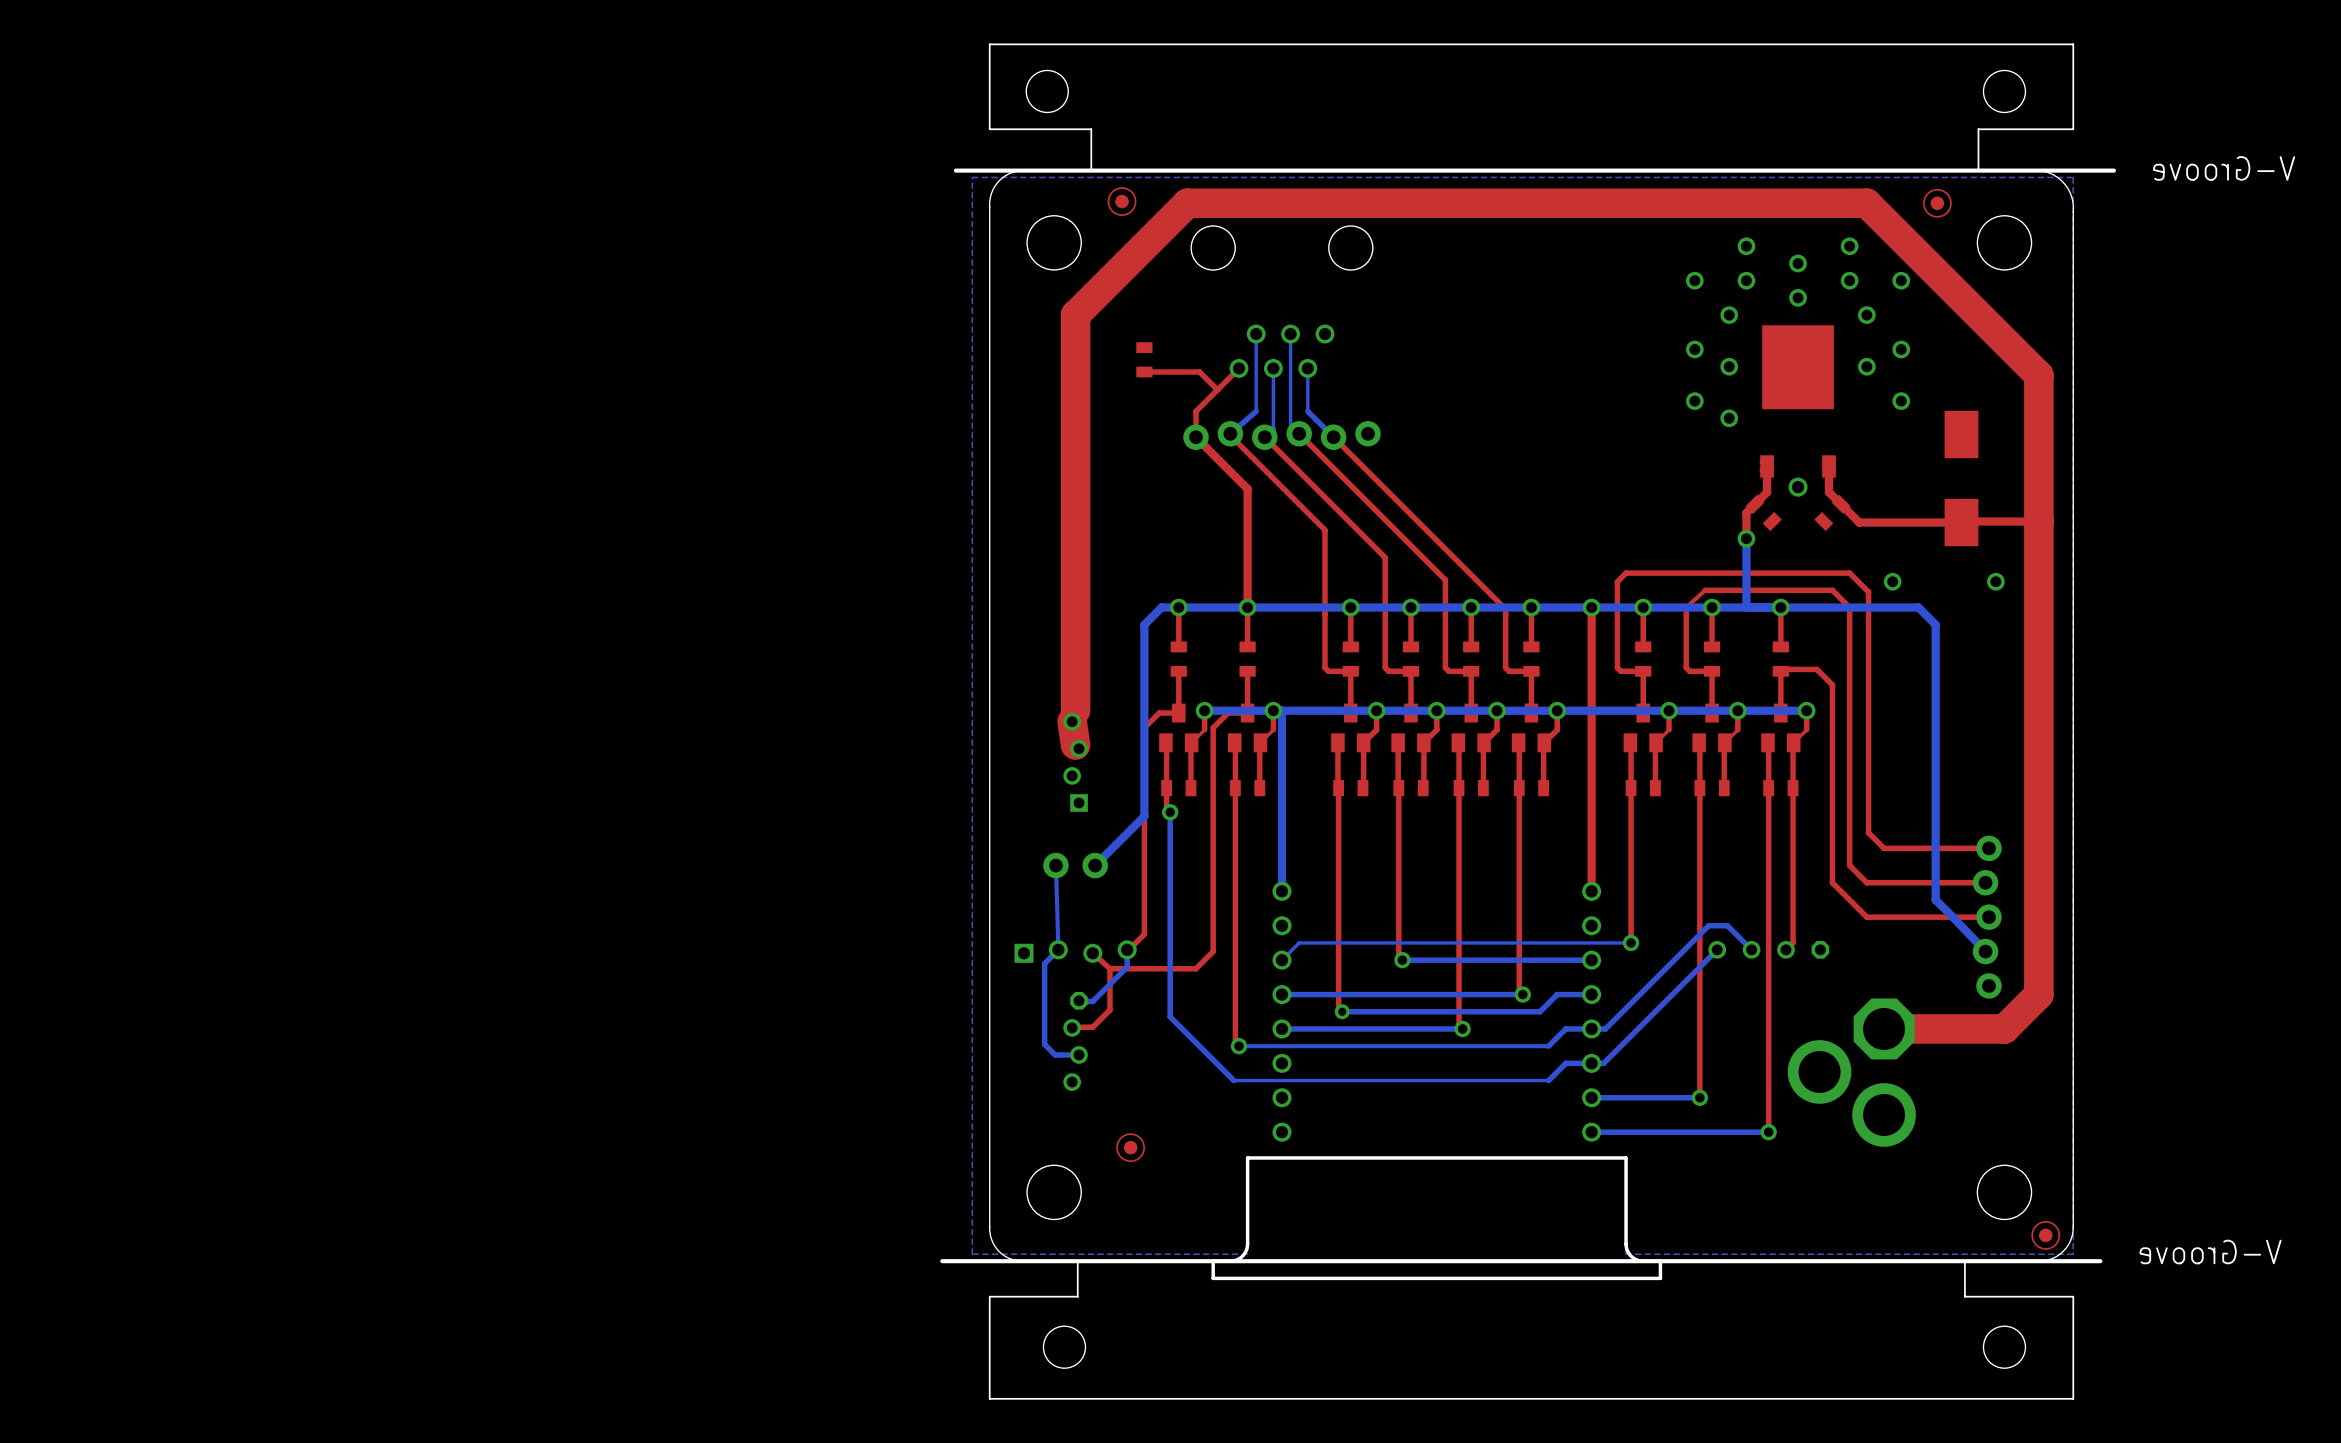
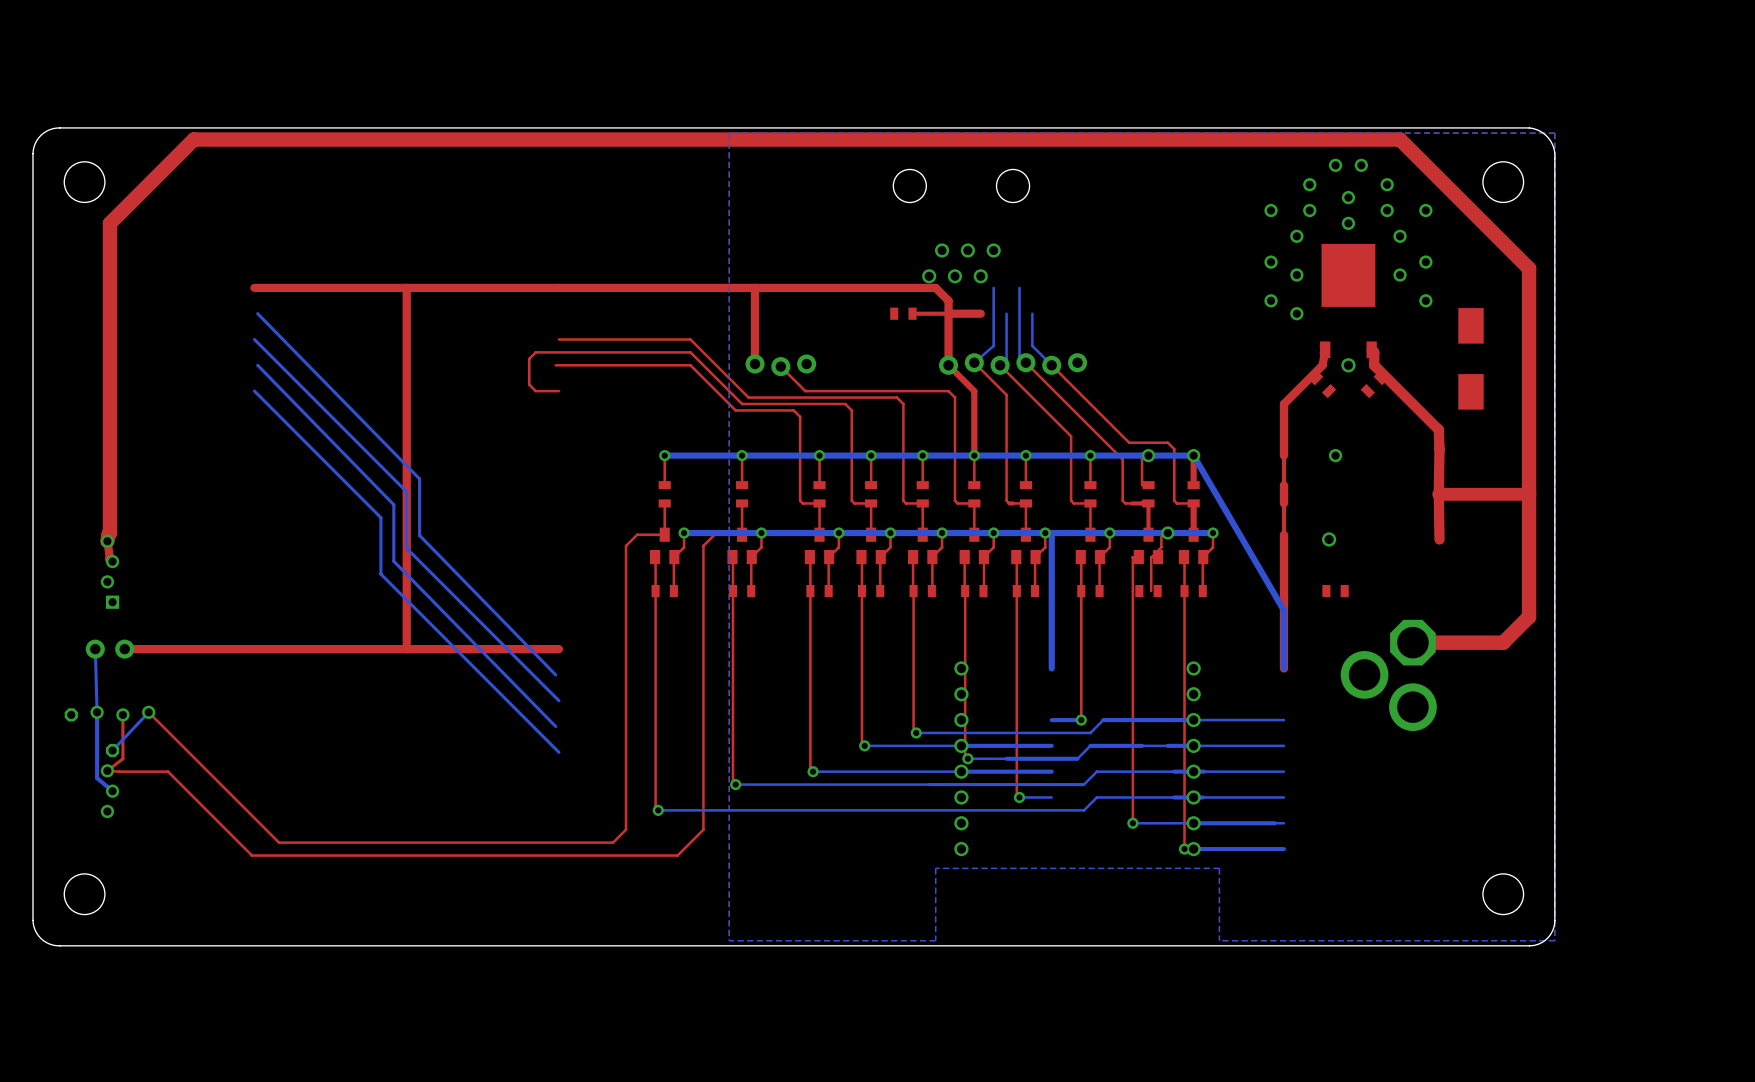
part: (1122, 201) -> none
part: (1937, 203) -> none
via: none -> (1335, 165)
via: none -> (1361, 165)
bottom track: (1256, 334) (1256, 411) (1230, 433) -> (993, 287) (993, 345) (974, 362)
bottom track: (1290, 334) (1290, 428) (1299, 433) -> (1019, 287) (1019, 358) (1025, 362)
part rotation: 0° (1144, 359) -> 90° clockwise (903, 313)
part position: (1144, 359) -> (903, 313)
top track: (1239, 368) (1195, 411) (1195, 437) (1247, 488) (1247, 646) -> none
bottom track: (1273, 368) (1273, 428) (1264, 437) -> (1006, 313) (1006, 358) (1000, 365)
bottom track: (1307, 368) (1307, 411) (1333, 437) -> (1032, 313) (1032, 345) (1051, 365)
top track: (1144, 372) (1199, 372) (1217, 389) -> none
top track: (2038, 375) (1866, 203) (1187, 203) (1075, 315) (1075, 710) (1072, 721) (1075, 745) (1079, 748) -> (1529, 281) (1529, 268) (1400, 139) (193, 139) (110, 223) (110, 533) (107, 541) (110, 558) (112, 561)
top track width: thick (2038, 375) (2038, 822) -> thin (1529, 281) (1529, 616)
top track: none -> (254, 287) (935, 287) (948, 300) (948, 365) (974, 391) (974, 485)
top track: none -> (406, 287) (406, 649)
top track: none -> (755, 287) (755, 364)
bottom track: none -> (257, 313) (419, 478) (419, 535) (555, 674)
top track: none -> (980, 313) (912, 313)
top track: (1230, 433) (1325, 530) (1325, 667) (1328, 671) (1345, 671) -> (974, 362) (1006, 394) (1006, 500) (1009, 503)
top track: (1299, 433) (1445, 580) (1445, 667) (1449, 671) -> (1000, 365) (1071, 436) (1071, 500) (1073, 503) (1086, 503)
part position: (1282, 435) -> (1013, 364)
top track: (1264, 437) (1385, 557) (1385, 667) (1388, 671) (1411, 671) (1411, 713) -> none
top track: (1333, 437) (1505, 609) (1505, 667) (1509, 671) -> (1025, 362) (1122, 459) (1122, 500) (1125, 503) (1131, 503)
bottom track: none -> (254, 339) (406, 491) (406, 548) (558, 700)
top track: none -> (558, 339) (690, 339) (748, 397) (896, 397) (903, 404) (903, 500) (906, 503) (922, 503) (922, 534)
top track: (1767, 466) (1767, 492) (1746, 512) (1746, 538) -> (1325, 349) (1322, 365) (1283, 404) (1283, 455)
top track: (1829, 466) (1829, 492) (1859, 522) (2038, 521) -> (1371, 349) (1374, 352) (1374, 365) (1438, 429) (1438, 494)
bottom track: none -> (257, 365) (393, 504) (393, 561) (555, 726)
top track: none -> (555, 365) (690, 365) (735, 410) (793, 410) (800, 416) (800, 500) (802, 503) (819, 503) (819, 534)
part: none -> (780, 365)
top track: none -> (780, 366) (805, 391) (948, 391) (954, 397) (954, 500) (957, 503) (974, 503) (974, 534)
bottom track: none -> (254, 391) (380, 517) (380, 574) (558, 752)
top track: none -> (558, 391) (535, 391) (529, 384) (529, 358) (535, 352) (690, 352) (742, 404) (845, 404) (851, 410) (851, 500) (854, 503) (871, 503) (871, 534)
bottom track: (1746, 538) (1746, 607) -> none
via: (1746, 538) -> none
via: (1892, 581) -> none
via: (1995, 581) -> none
top track: none -> (664, 455) (664, 485)
via: none -> (664, 455)
via: none -> (742, 455)
top track: none -> (819, 455) (819, 485)
via: none -> (819, 455)
bottom track: (1161, 607) (1144, 624) (1144, 816) (1095, 865) -> (871, 455) (664, 455)
via: none -> (871, 455)
top track: (1178, 607) (1178, 646) -> (742, 455) (742, 485)
via: (1178, 607) -> none
via: none -> (922, 455)
via: (1247, 607) -> none
via: none -> (974, 455)
top track: (1350, 607) (1350, 646) -> (871, 455) (871, 485)
via: (1350, 607) -> none
via: none -> (1025, 455)
top track: (1411, 607) (1411, 646) -> (922, 455) (922, 485)
via: (1411, 607) -> none
via: none -> (1090, 455)
top track: (1471, 607) (1471, 646) -> (1025, 455) (1025, 485)
via: (1471, 607) -> none
top track: (1531, 607) (1531, 646) -> none
bottom track: (1591, 607) (1918, 607) (1935, 624) (1935, 899) (1985, 951) -> (1193, 455) (1283, 610) (1283, 668)
top track: (1643, 607) (1643, 646) -> (1090, 455) (1090, 485)
via: (1643, 607) -> none
via: (1712, 607) -> none
top track: (1780, 607) (1780, 646) -> (1142, 455) (1142, 485)
top track: (1591, 646) (1591, 671) -> (1051, 365) (1129, 442) (1167, 442) (1174, 449) (1174, 500) (1176, 503) (1193, 503)
part: none -> (664, 494)
part: none -> (742, 494)
part: none -> (819, 494)
part position: (1178, 659) -> (871, 494)
part position: (1247, 659) -> (922, 494)
part: none -> (974, 494)
part position: (1350, 659) -> (1025, 494)
part: (1411, 659) -> none
part position: (1471, 659) -> (1090, 494)
part position: (1643, 659) -> (1193, 494)
part: (1712, 659) -> none
part: (1780, 659) -> none
top track: none -> (1438, 494) (1439, 539)
top track: none -> (1529, 494) (1438, 494)
top track: none -> (664, 503) (664, 534) (637, 534) (626, 545) (626, 829) (613, 842) (279, 842) (148, 712)
top track: none -> (742, 503) (742, 534) (714, 534) (703, 545) (703, 829) (677, 855) (251, 855) (168, 771) (107, 770) (122, 758) (122, 714)
top track: (1178, 671) (1178, 713) (1159, 713) (1144, 727) (1144, 934) (1127, 949) -> none
top track: (1247, 671) (1247, 713) (1228, 713) (1213, 727) (1213, 951) (1195, 968) (1109, 968) -> none
top track: (1350, 671) (1350, 713) -> (1013, 503) (1025, 503) (1025, 534)
top track: (1454, 671) (1471, 671) (1471, 713) -> (1090, 503) (1090, 534)
top track: (1712, 671) (1689, 671) (1686, 667) (1686, 607) (1705, 590) (1832, 590) (1849, 607) (1849, 865) (1866, 882) (1985, 882) -> (1283, 503) (1283, 485)
top track: none -> (684, 533) (684, 547) (673, 557) (673, 591)
via: none -> (684, 533)
via: none -> (761, 533)
top track: none -> (838, 533) (838, 547) (828, 557) (828, 591)
via: none -> (838, 533)
top track: none -> (890, 533) (890, 547) (880, 557) (880, 591)
via: none -> (890, 533)
top track: (1204, 710) (1204, 729) (1190, 743) (1190, 788) -> (761, 533) (761, 547) (751, 557) (751, 591)
bottom track: none -> (903, 533) (684, 533)
via: (1204, 710) -> none
via: none -> (942, 533)
top track: (1273, 710) (1273, 729) (1259, 743) (1259, 788) -> (1045, 533) (1045, 547) (1035, 557) (1035, 591)
via: (1273, 710) -> none
bottom track: (1282, 710) (1282, 891) -> (1051, 533) (1051, 668)
via: none -> (993, 533)
top track: (1376, 710) (1376, 729) (1363, 742) (1363, 788) -> (942, 533) (942, 547) (932, 557) (931, 591)
via: (1376, 710) -> none
via: none -> (1045, 533)
top track: (1436, 710) (1436, 729) (1423, 742) (1423, 788) -> (993, 533) (993, 547) (983, 557) (983, 591)
via: (1436, 710) -> none
via: none -> (1109, 533)
top track: (1497, 710) (1497, 729) (1483, 743) (1483, 788) -> (1212, 533) (1212, 547) (1202, 557) (1202, 591)
via: (1497, 710) -> none
top track: (1557, 710) (1557, 729) (1543, 743) (1543, 788) -> none
via: none -> (1212, 533)
top track: (1669, 710) (1669, 729) (1655, 743) (1655, 788) -> (1109, 533) (1109, 547) (1099, 557) (1099, 591)
via: (1669, 710) -> none
top track: (1737, 710) (1737, 729) (1724, 743) (1724, 788) -> (1161, 533) (1161, 547) (1151, 557) (1151, 591)
via: (1737, 710) -> none
top track: (1806, 710) (1806, 729) (1793, 743) (1793, 942) (1786, 949) -> none
bottom track: (1806, 710) (1617, 710) -> none
via: (1806, 710) -> none
top track: (1591, 713) (1591, 891) -> (1283, 534) (1283, 668)
top track: (1643, 713) (1643, 671) (1621, 671) (1617, 667) (1617, 581) (1626, 573) (1849, 573) (1868, 592) (1868, 832) (1884, 848) (1988, 848) -> none
top track: (1780, 713) (1780, 671) (1782, 669) (1816, 669) (1832, 684) (1832, 882) (1866, 917) (1988, 917) -> none
part: none -> (793, 536)
via: none -> (1329, 539)
part: (1528, 721) -> none
part: none -> (664, 545)
part: none -> (742, 545)
part: none -> (819, 545)
part position: (1178, 727) -> (871, 545)
part position: (1247, 727) -> (922, 545)
part: none -> (974, 545)
part position: (1350, 727) -> (1025, 545)
part: (1411, 727) -> none
part position: (1471, 727) -> (1090, 545)
part position: (1643, 727) -> (1193, 545)
part: (1712, 727) -> none
part: (1780, 727) -> none
top track: none -> (655, 557) (655, 806) (658, 810)
top track: none -> (809, 557) (810, 768) (813, 771)
top track: none -> (861, 557) (861, 743) (864, 745)
top track: (1165, 742) (1166, 807) (1170, 812) -> none
top track: none -> (913, 557) (913, 730) (916, 732)
top track: (1234, 742) (1235, 1042) (1239, 1046) -> (732, 557) (732, 781) (735, 784)
top track: (1337, 742) (1338, 1008) (1342, 1011) -> (964, 557) (965, 756) (967, 758)
top track: none -> (1016, 557) (1016, 794) (1019, 797)
top track: (1398, 742) (1398, 956) (1402, 960) -> none
top track: none -> (1080, 557) (1081, 720)
top track: (1458, 742) (1459, 1025) (1462, 1028) -> none
top track: (1518, 742) (1519, 990) (1522, 994) -> none
top track: (1630, 742) (1631, 942) -> none
top track: (1699, 742) (1699, 1097) -> (1132, 557) (1132, 823)
top track: (1767, 742) (1768, 1132) -> (1183, 557) (1184, 849)
part: none -> (110, 571)
part: (1075, 762) -> none
part: none -> (664, 591)
part: none -> (742, 591)
part: none -> (819, 591)
part position: (1178, 788) -> (871, 591)
part position: (1247, 788) -> (922, 591)
part: none -> (974, 591)
part position: (1350, 788) -> (1025, 591)
part: (1411, 788) -> none
part position: (1471, 788) -> (1090, 591)
part position: (1643, 788) -> (1193, 591)
part: (1712, 788) -> none
bottom track: (1170, 812) (1170, 1016) (1233, 1080) -> (658, 810) (925, 810)
via: (1170, 812) -> none
top track: (2038, 822) (2038, 994) (2004, 1028) (1884, 1028) -> (1529, 616) (1503, 642) (1412, 642)
bottom track: none -> (95, 649) (97, 778) (112, 791)
part: none -> (110, 649)
top track: none -> (558, 649) (124, 649)
bottom track: (1055, 865) (1058, 949) (1044, 963) (1044, 1044) (1055, 1054) (1079, 1054) -> none
part: (1075, 865) -> none
part: (1987, 917) -> none
bottom track: (1631, 942) (1299, 942) (1282, 960) -> none
via: (1631, 942) -> none
bottom track: none -> (148, 712) (112, 750)
bottom track: (1127, 949) (1127, 967) (1092, 1001) (1079, 1000) -> none
bottom track: (1717, 949) (1603, 1063) -> (1283, 797) (1202, 797)
bottom track: (1751, 949) (1727, 925) (1708, 925) (1605, 1028) -> (1283, 771) (1203, 771)
part: (1768, 949) -> none
top track: (1092, 953) (1109, 968) -> none
via: (1402, 960) -> none
via: none -> (1081, 720)
bottom track: (1471, 960) (1441, 960) -> (1103, 720) (1090, 732) (916, 732)
bottom track: none -> (1283, 720) (1193, 720)
top track: (1109, 968) (1109, 1010) (1092, 1027) (1072, 1027) -> none
via: none -> (916, 732)
via: none -> (864, 745)
bottom track: none -> (961, 745) (864, 745)
bottom track: (1454, 994) (1402, 994) -> (1090, 745) (1077, 758)
via: (1522, 994) -> none
bottom track: (1557, 994) (1540, 1011) (1436, 1011) -> (1167, 745) (1142, 745)
bottom track: none -> (1283, 745) (1193, 745)
via: none -> (967, 758)
bottom track: none -> (1006, 758) (967, 758)
via: (1342, 1011) -> none
part: none -> (110, 761)
part: (1075, 1015) -> none
via: none -> (813, 771)
bottom track: none -> (961, 771) (813, 771)
bottom track: (1462, 1028) (1402, 1028) -> none
via: (1462, 1028) -> none
bottom track: (1565, 1028) (1548, 1046) (1445, 1046) -> (1174, 771) (1096, 771) (1083, 784)
via: none -> (735, 784)
bottom track: none -> (929, 784) (735, 784)
via: (1239, 1046) -> none
via: none -> (1019, 797)
bottom track: none -> (1051, 797) (1019, 797)
bottom track: (1565, 1063) (1548, 1080) (1445, 1080) -> (1174, 797) (1096, 797) (1083, 810)
part position: (1851, 1072) -> (1388, 675)
via: none -> (658, 810)
via: none -> (1132, 823)
bottom track: none -> (1193, 823) (1132, 823)
via: (1699, 1097) -> none
bottom track: none -> (1283, 823) (1274, 823)
via: none -> (1184, 849)
bottom track: (1768, 1132) (1712, 1132) -> none
via: (1768, 1132) -> none
part: (1130, 1147) -> none
board edge: (1626, 1157) (1626, 1248) (1629, 1254) (1636, 1259) (1660, 1261) (1660, 1278) (1213, 1278) (1213, 1261) (1236, 1259) (1244, 1254) (1247, 1248) (1247, 1157) (1626, 1157) -> none
part: (2045, 1235) -> none

